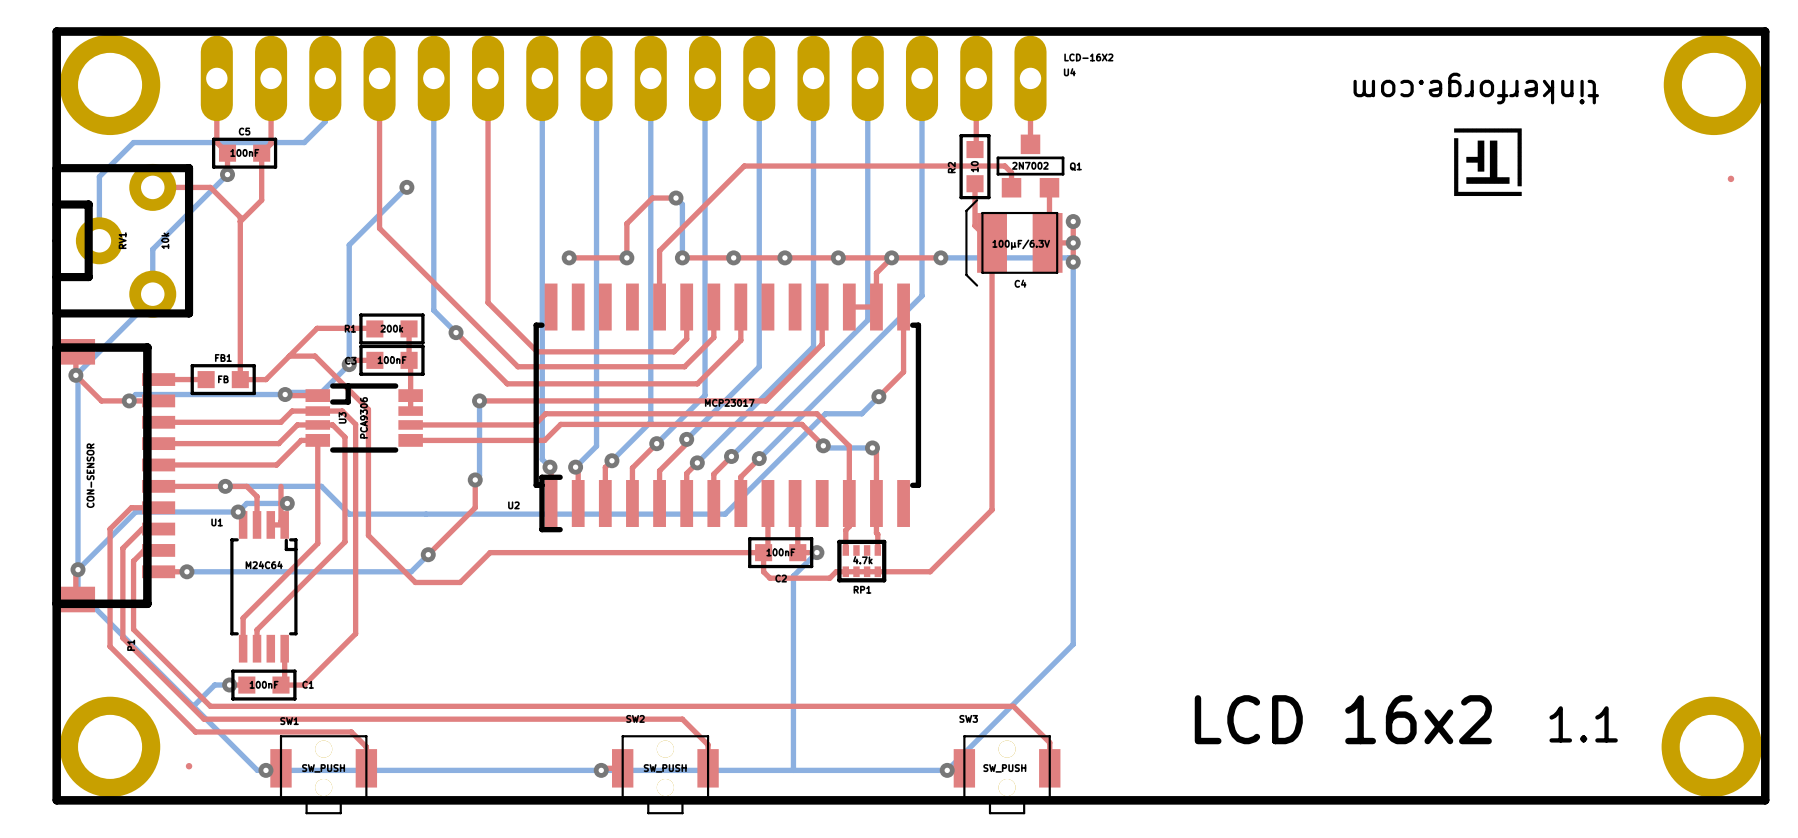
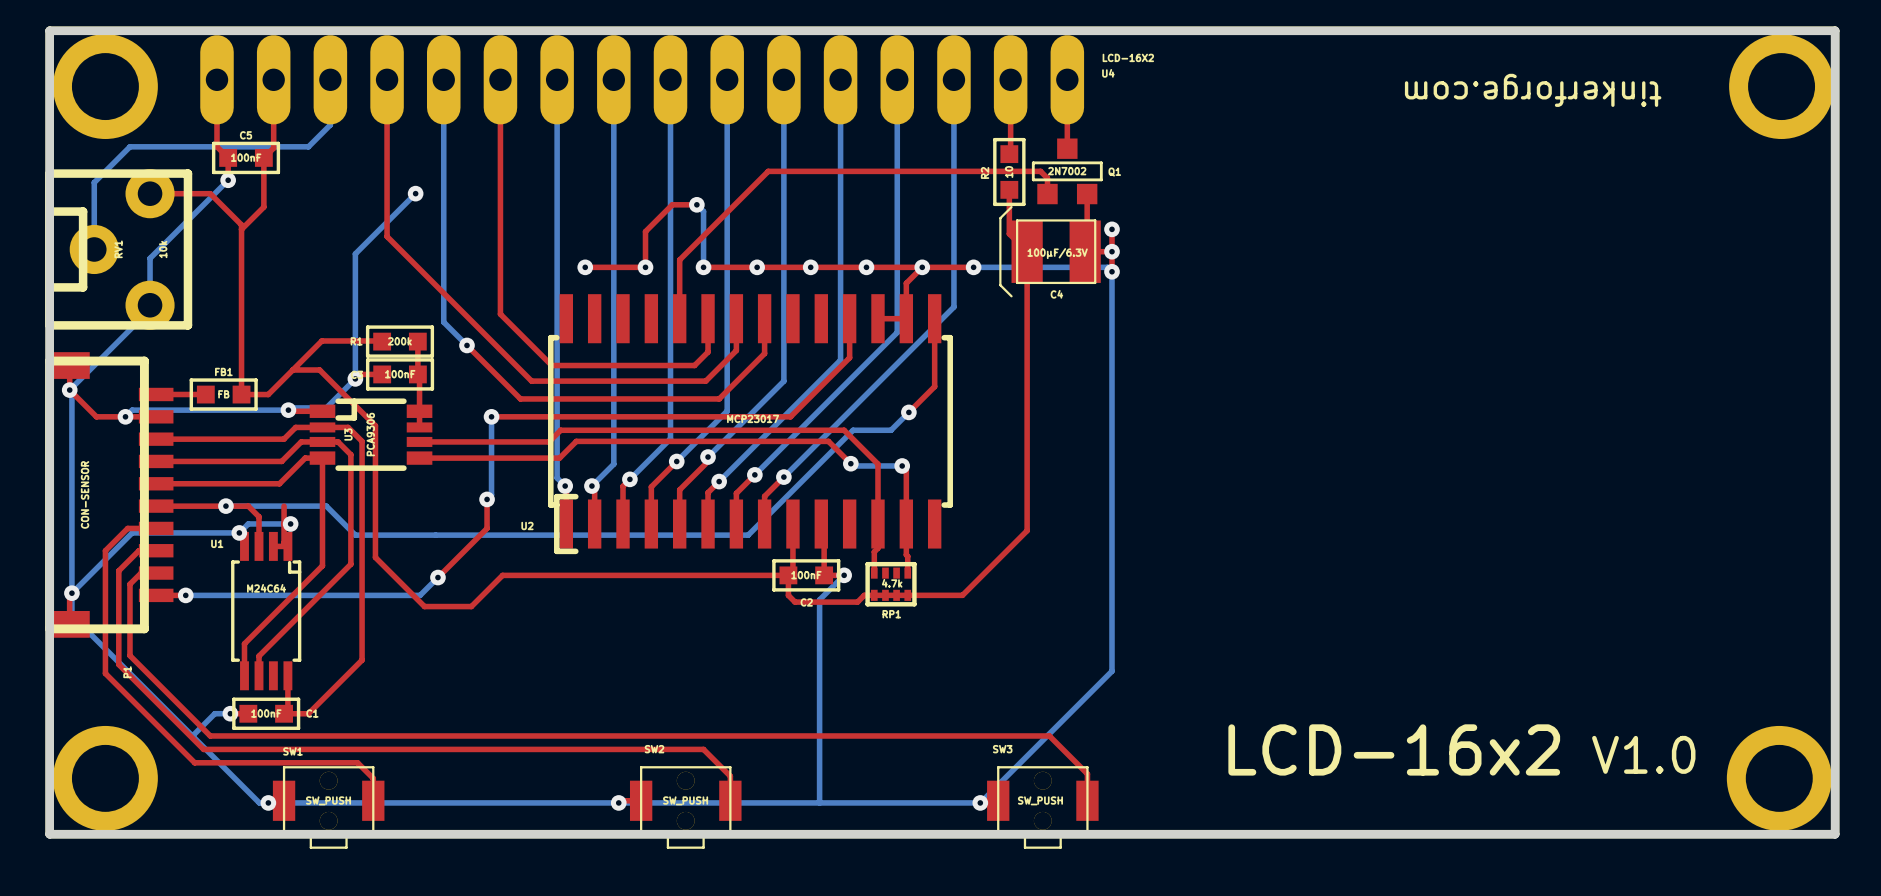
drawing: [1454, 128, 1522, 197] -> none
part: (1730, 178) -> none
text: LCD 16x2 (1343, 719) -> LCD-16x2 (1394, 749)
text: 1.1 (1583, 724) -> V1.0 (1643, 754)
part: (189, 766) -> none

